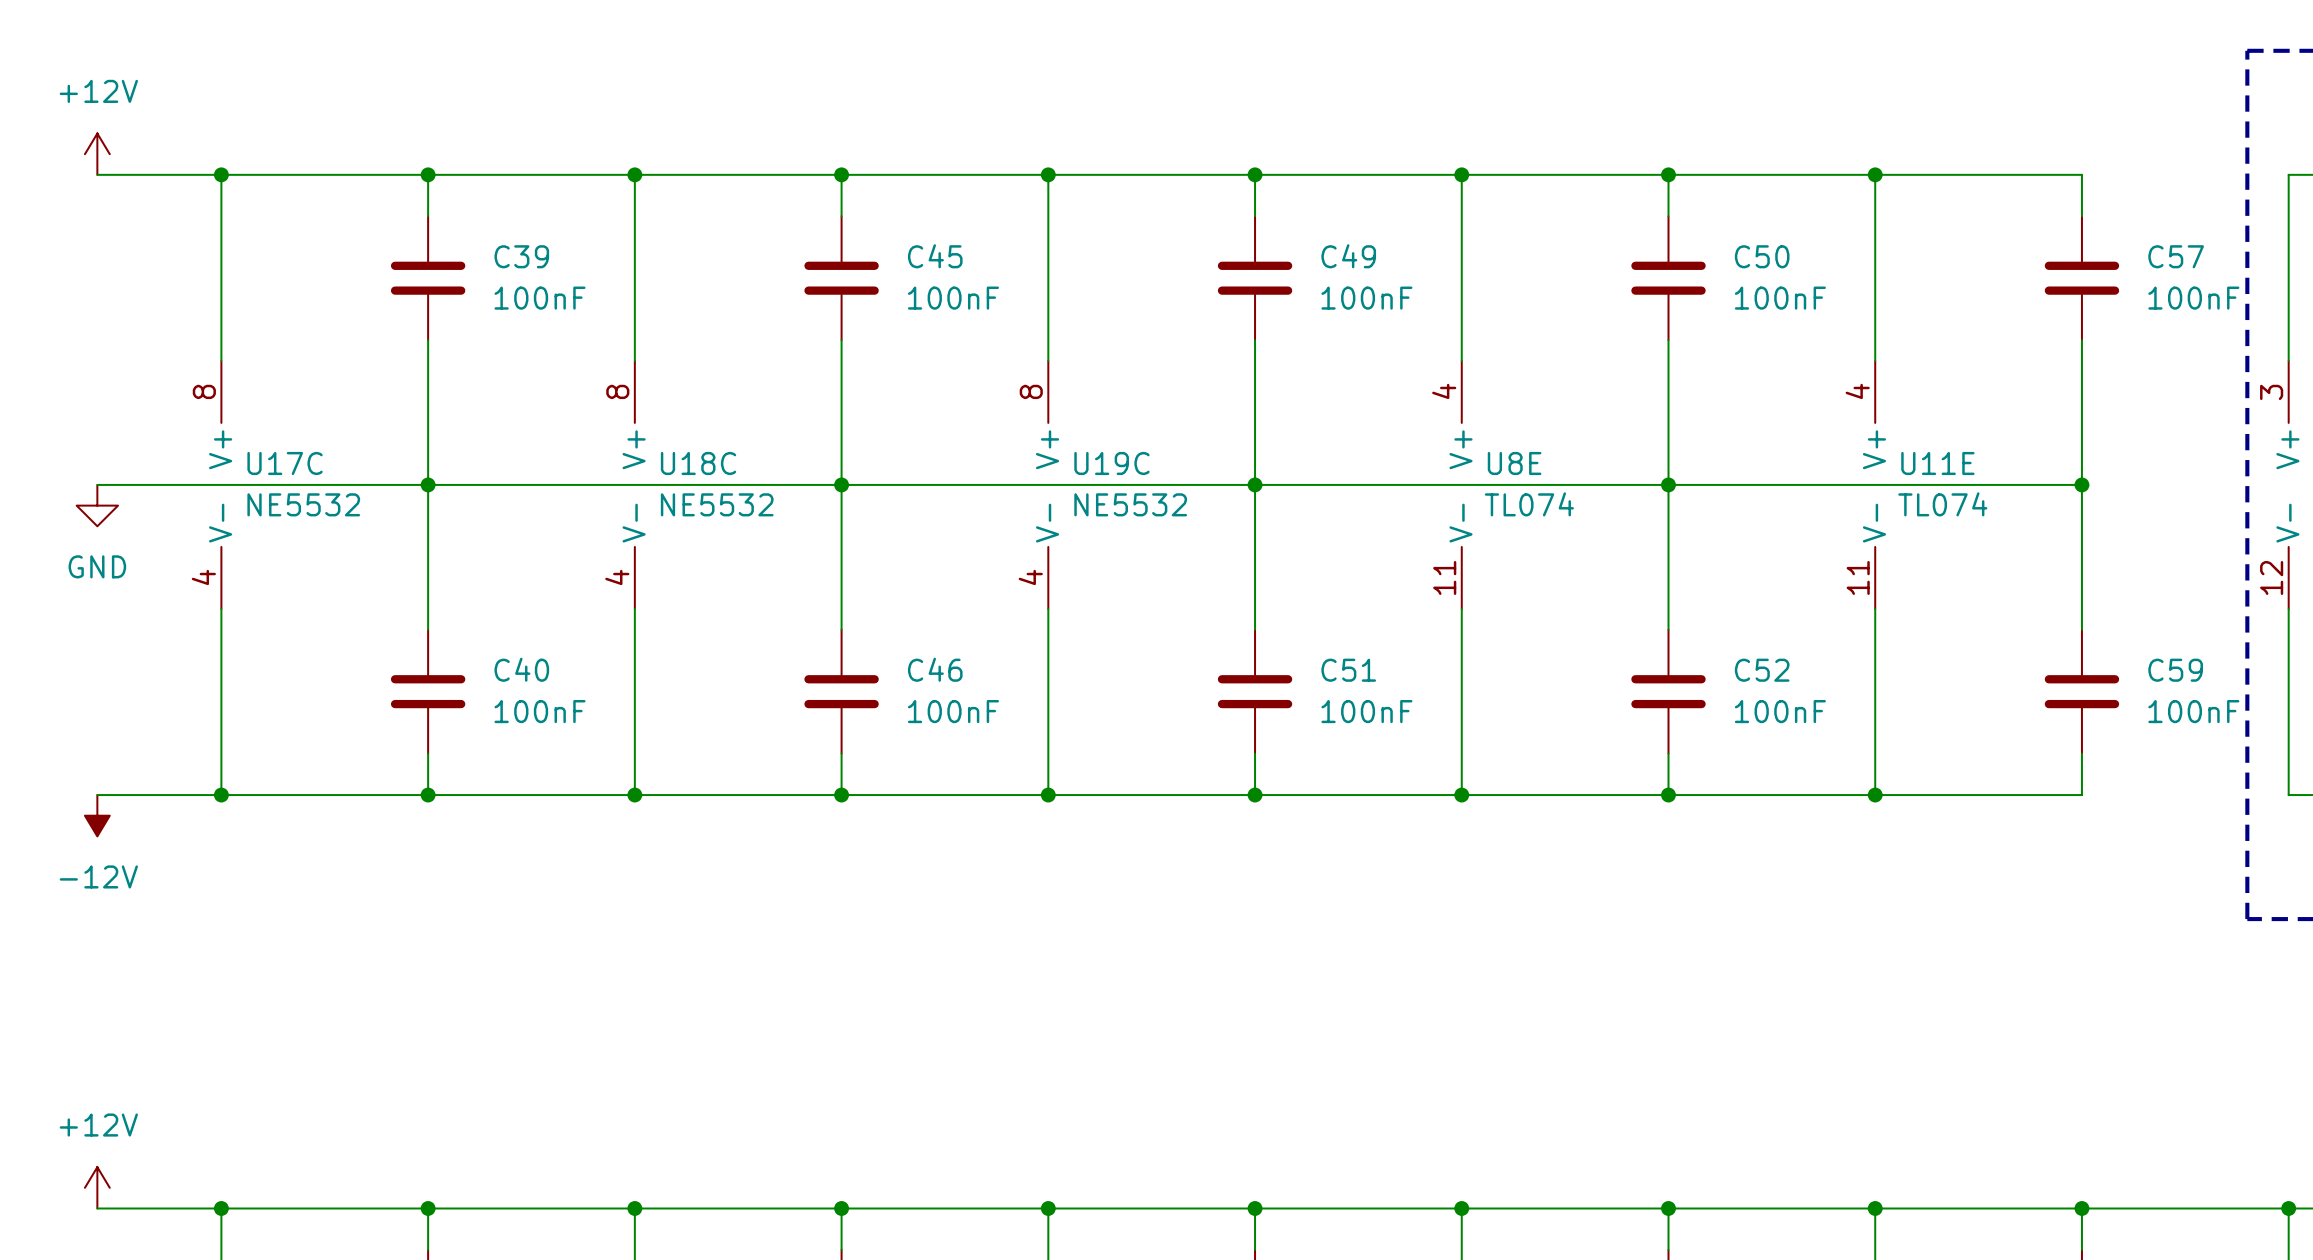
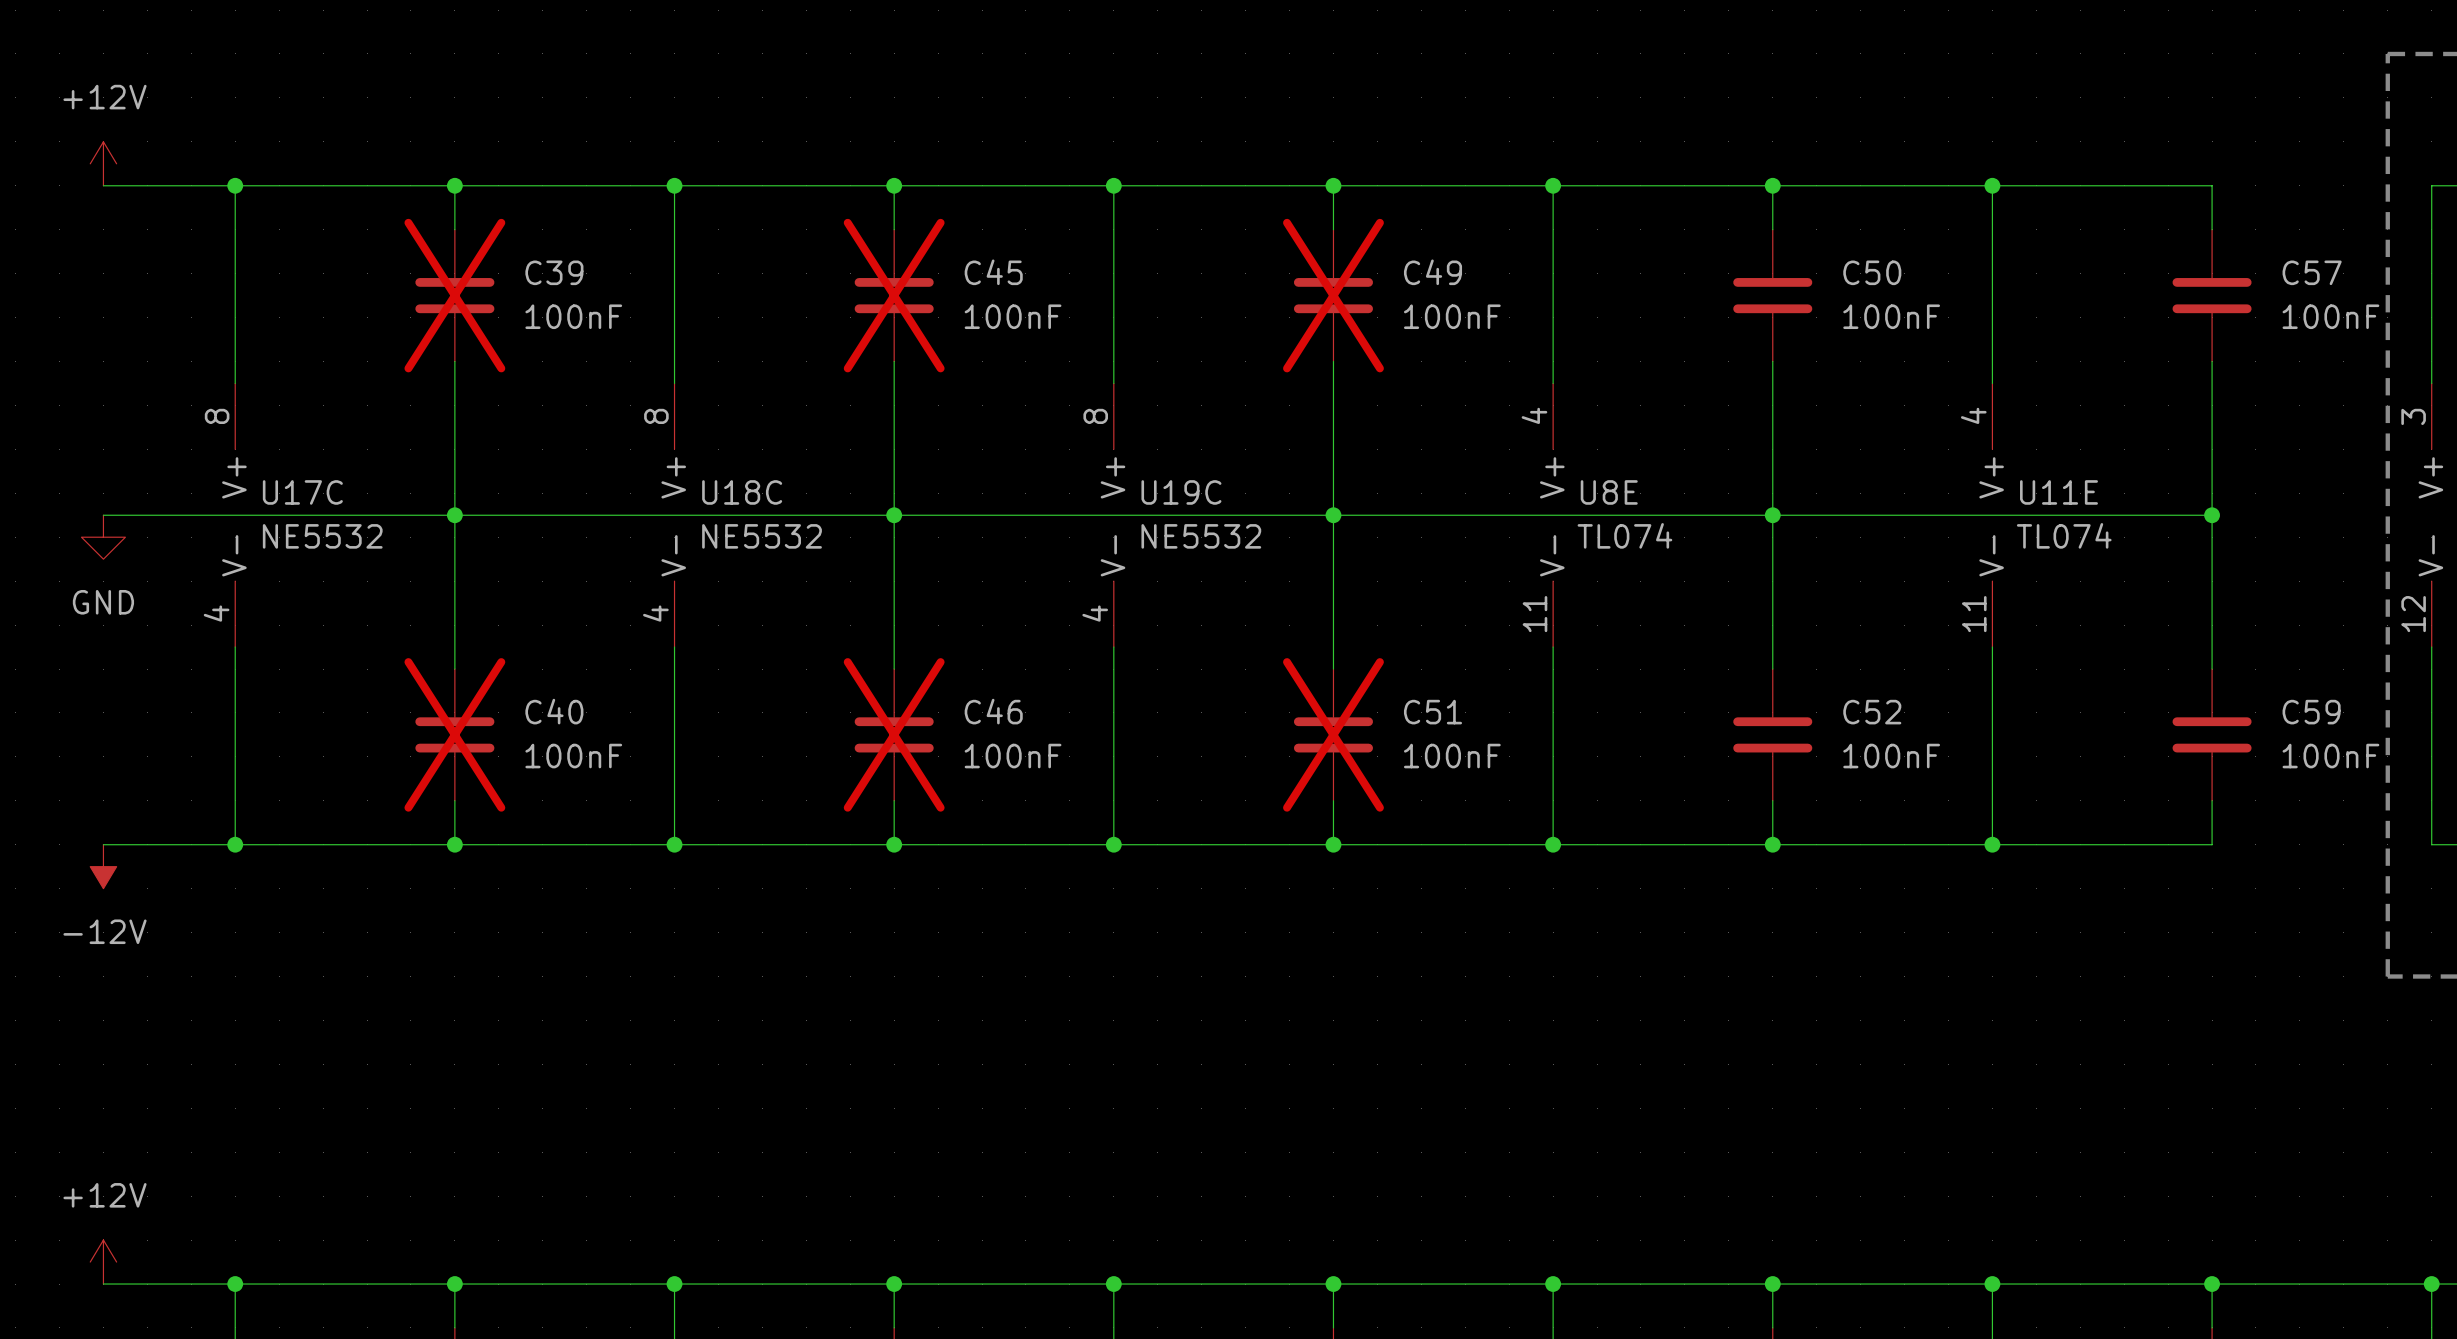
C39 do-not-place cross: none -> (454, 295)
C45 do-not-place cross: none -> (894, 295)
C49 do-not-place cross: none -> (1333, 295)
C40 do-not-place cross: none -> (454, 734)
C46 do-not-place cross: none -> (894, 734)
C51 do-not-place cross: none -> (1333, 734)

